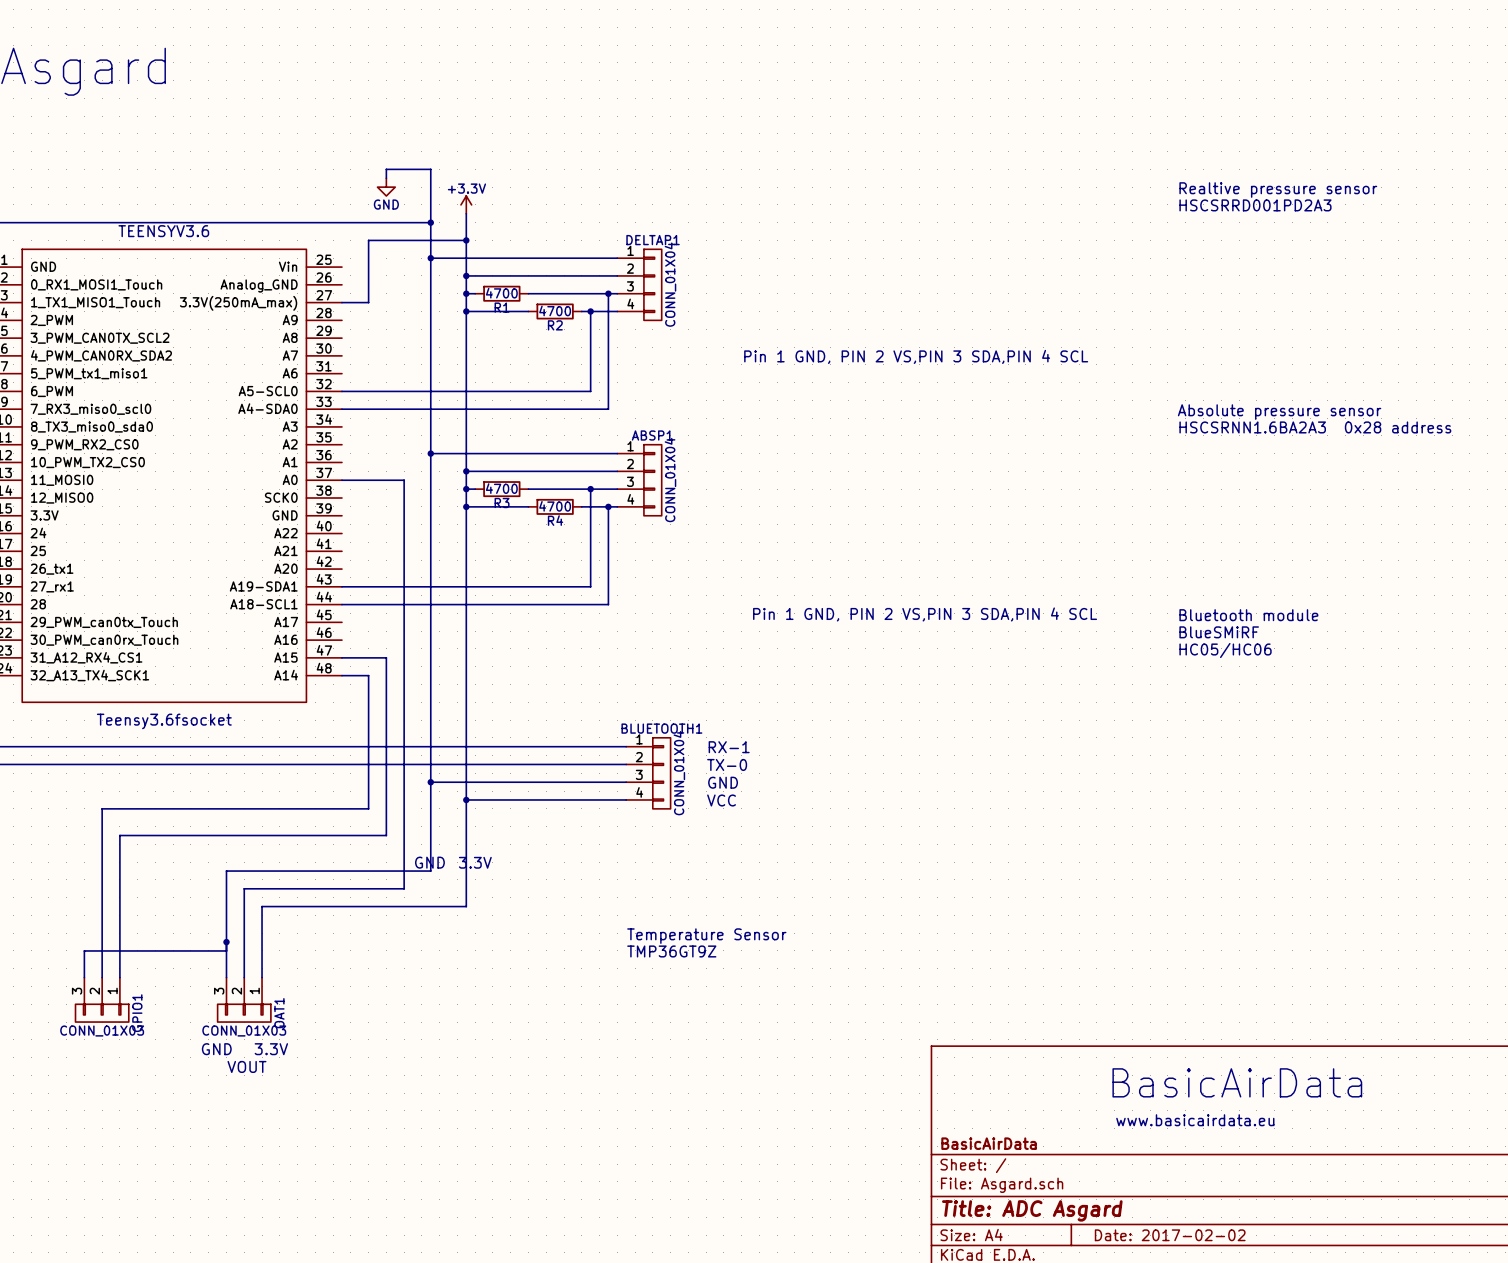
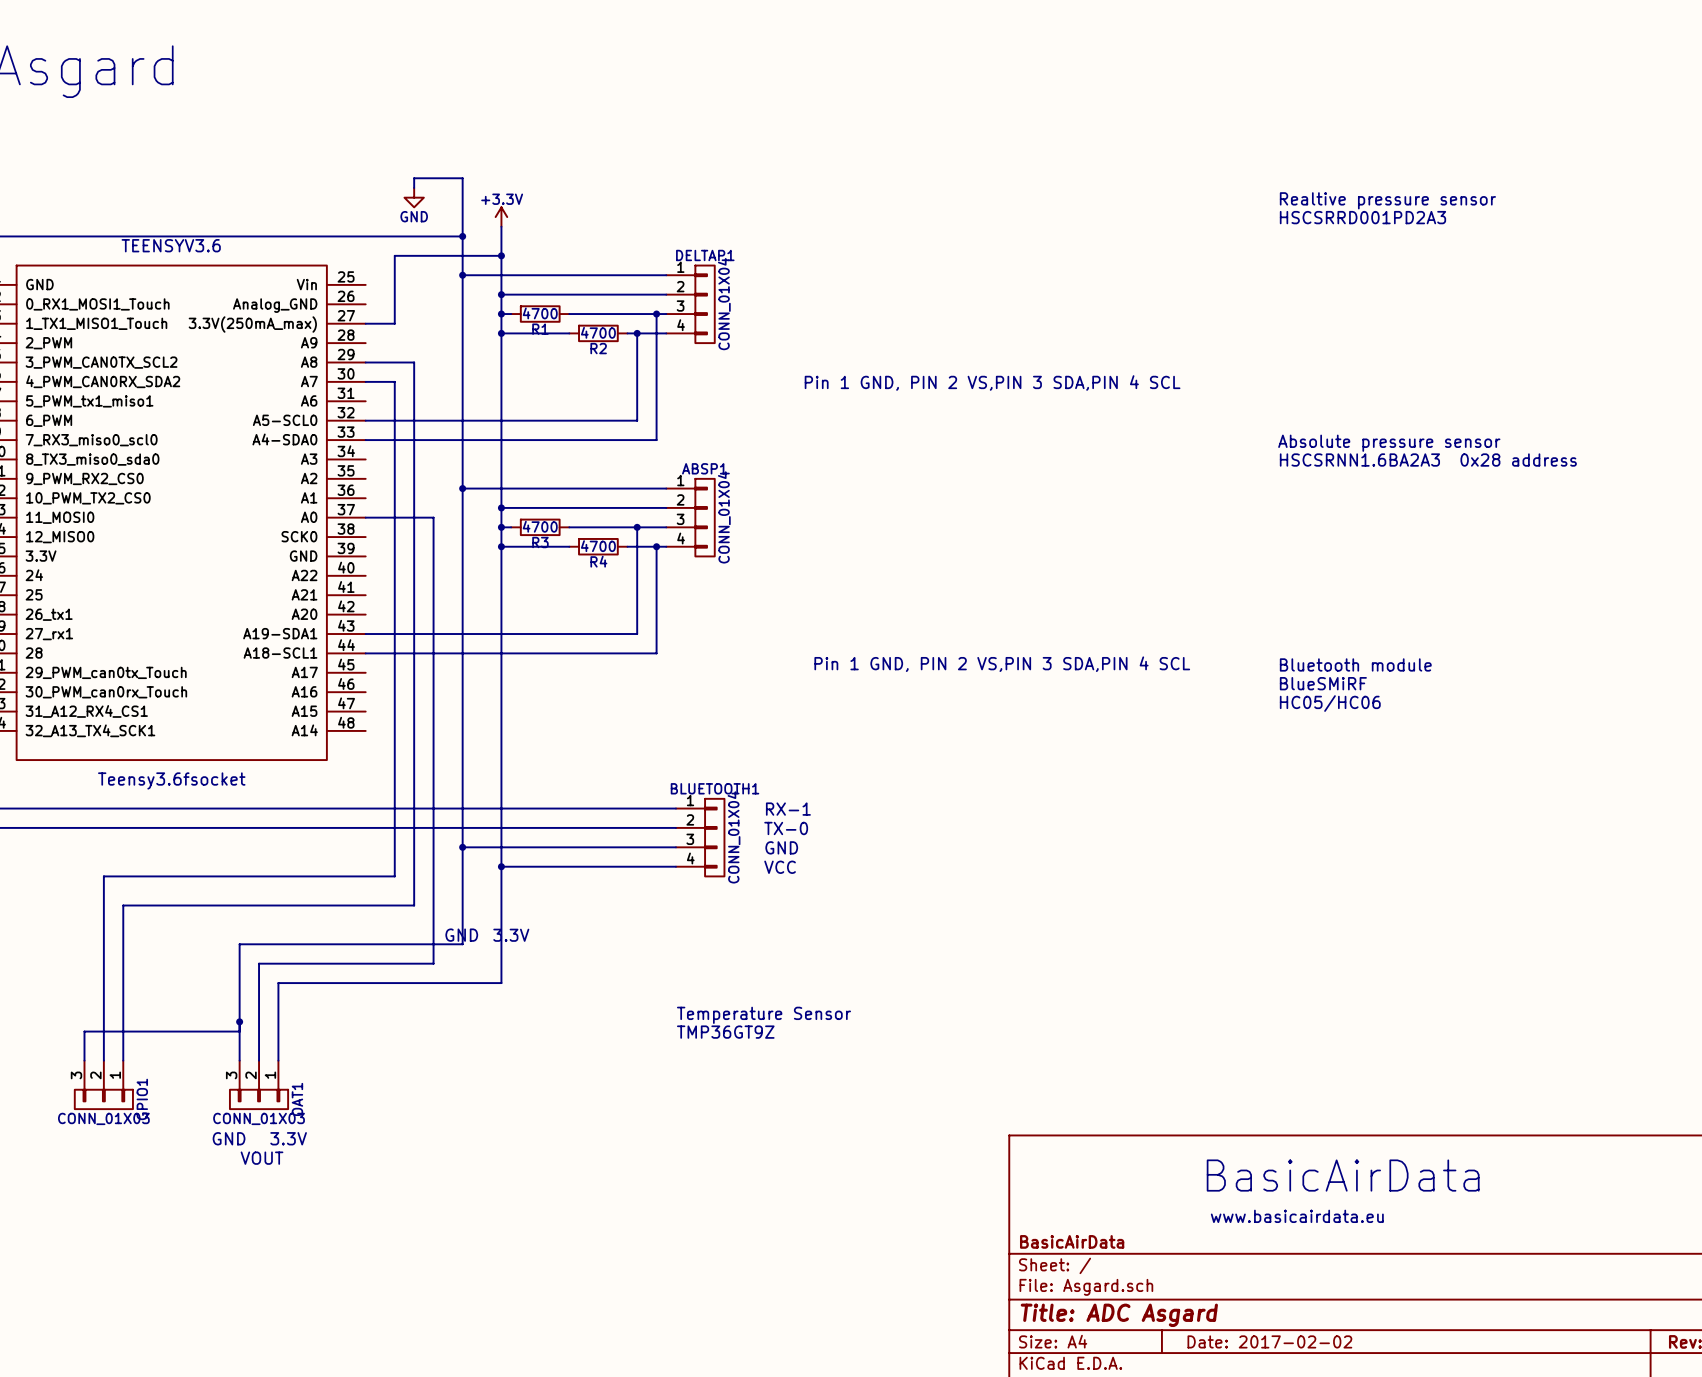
wire: (341, 657) (386, 657) -> (365, 362) (414, 362) (414, 711)
wire: (341, 675) (368, 675) -> (365, 381) (394, 381) (394, 730)

